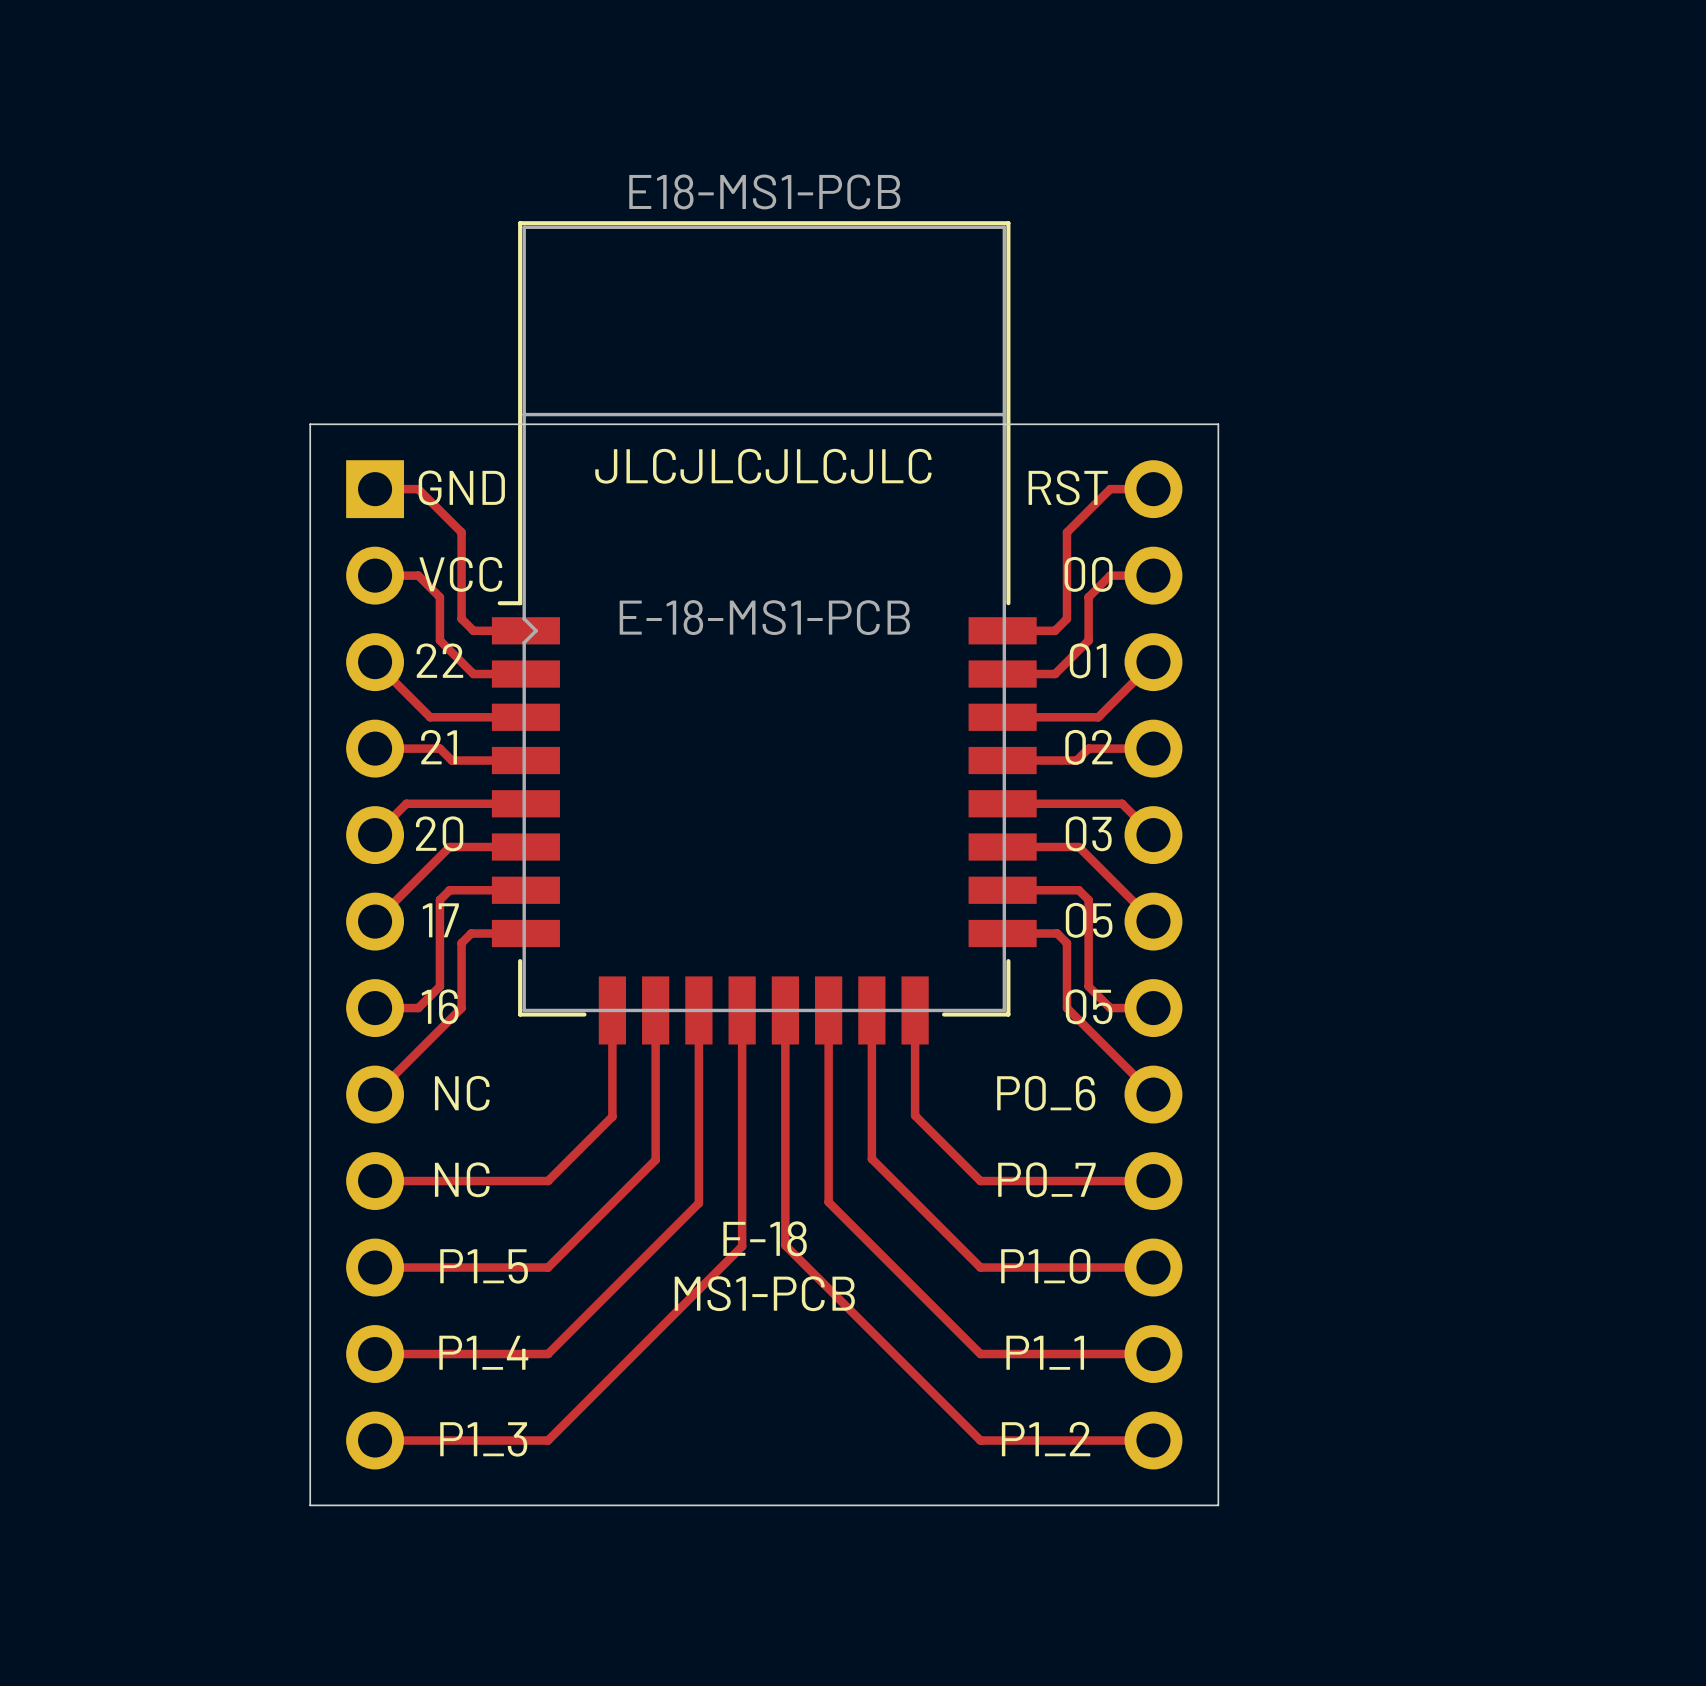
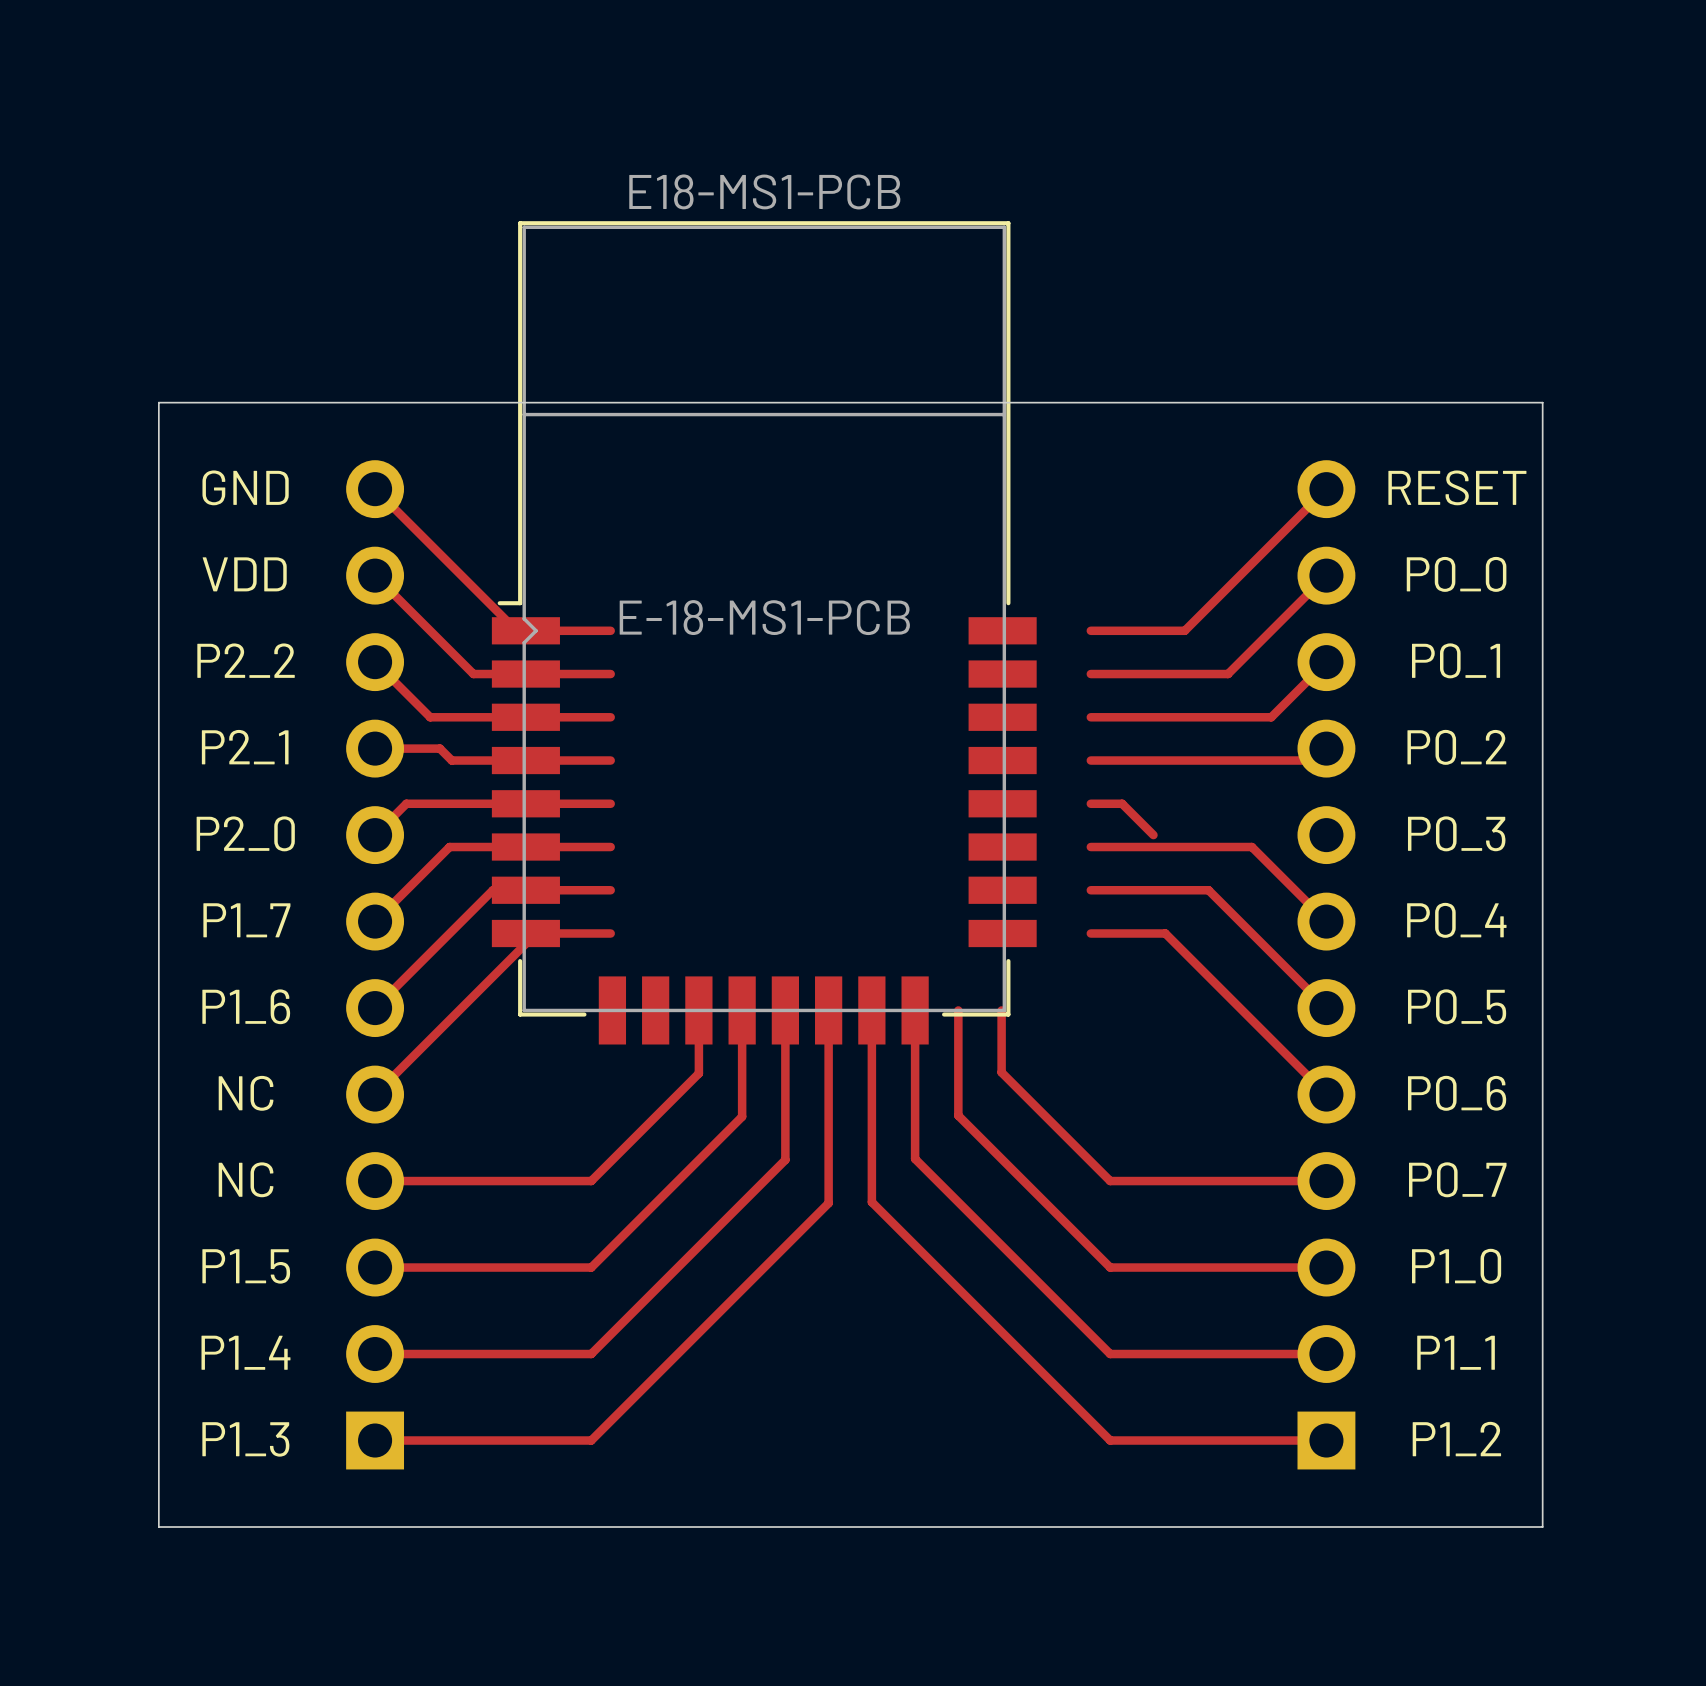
board edge: (310, 424) (310, 1505) (1218, 1505) (1218, 424) (310, 424) -> (158, 402) (158, 1527) (1542, 1527) (1542, 402) (158, 402)
text: JLCJLCJLCJLC (763, 466) -> none
text position: GND (461, 487) -> GND (245, 487)
text: RST (1068, 487) -> none
text: none -> RESET (1457, 487)
top track: (375, 489) (418, 489) (461, 532) (461, 618) (473, 630) (516, 630) -> (375, 489) (516, 630)
top track: (1153, 489) (1110, 489) (1066, 532) (1066, 618) (1055, 630) (1002, 630) -> none
top track: none -> (1326, 489) (1184, 630) (1090, 630)
text: none -> VDD (244, 574)
text: VCC (460, 574) -> none
text: 00 (1088, 574) -> none
text: none -> P0_0 (1456, 574)
top track: (375, 575) (418, 575) (439, 597) (439, 640) -> (375, 575) (439, 640)
top track: (1153, 575) (1110, 575) (1088, 597) (1088, 640) (1055, 674) (1002, 674) -> none
top track: none -> (1326, 575) (1228, 674) (1090, 674)
top track: none -> (525, 630) (610, 630)
text: none -> P2_2 (246, 660)
text: 22 (439, 660) -> none
text: 01 (1088, 660) -> none
text: none -> P0_1 (1456, 660)
top track: (1153, 662) (1098, 717) -> (1326, 662) (1271, 717) (1098, 717)
top track: none -> (525, 674) (610, 674)
top track: none -> (525, 717) (610, 717)
top track: (1002, 717) (1090, 717) -> none
text: none -> P2_1 (245, 747)
text: 21 (439, 747) -> none
text: 02 (1088, 747) -> none
text: none -> P0_2 (1456, 747)
top track: (1153, 748) (1088, 748) (1076, 760) (1002, 760) -> none
top track: none -> (1326, 748) (1314, 760) (1090, 760)
top track: none -> (525, 760) (610, 760)
top track: none -> (525, 803) (610, 803)
top track: (1002, 803) (1090, 803) -> none
text: none -> P2_0 (245, 833)
text: 20 (439, 833) -> none
text: 03 (1088, 833) -> none
text: none -> P0_3 (1456, 833)
top track: none -> (525, 847) (610, 847)
top track: (1002, 847) (1078, 847) (1153, 921) -> none
top track: none -> (1090, 847) (1251, 847) (1326, 921)
top track: (492, 890) (449, 890) (439, 899) (439, 986) (418, 1008) (375, 1008) -> (492, 890) (375, 1008)
top track: none -> (525, 890) (610, 890)
top track: (1002, 890) (1078, 890) (1088, 899) (1088, 986) (1110, 1008) (1153, 1008) -> none
top track: none -> (1090, 890) (1208, 890) (1326, 1008)
text: none -> P1_7 (246, 920)
text: 17 (440, 920) -> none
text: 05 (1089, 920) -> none
text: none -> P0_4 (1456, 920)
top track: (525, 933) (471, 933) (461, 943) (461, 1008) -> (610, 933) (536, 933) (461, 1008)
top track: (1002, 933) (1057, 933) (1066, 943) (1066, 1008) (1153, 1094) -> none
top track: none -> (1090, 933) (1165, 933) (1326, 1094)
part rotation: 0° (375, 964) -> 180° (375, 964)
part: (1153, 964) -> none
part: none -> (1326, 964)
text: none -> P1_6 (246, 1006)
text: 16 (440, 1006) -> none
text: 05 (1089, 1006) -> none
text: none -> P0_5 (1457, 1006)
top track: (612, 1010) (612, 1116) (548, 1181) -> (698, 1073) (591, 1181) (548, 1181)
top track: (655, 1010) (655, 1159) (548, 1267) -> (742, 1116) (591, 1267) (548, 1267)
top track: (698, 1073) (698, 1203) (548, 1354) -> (785, 1159) (591, 1354) (548, 1354)
text: none -> NC (246, 1093)
text: NC (462, 1093) -> none
text position: P0_6 (1046, 1093) -> P0_6 (1457, 1093)
top track: (915, 1115) (980, 1181) (1110, 1181) -> (1001, 1010) (1001, 1072) (1110, 1181)
top track: (742, 1116) (742, 1246) (548, 1440) -> (828, 1202) (591, 1440) (548, 1440)
top track: (871, 1158) (980, 1267) (1110, 1267) -> (958, 1010) (958, 1115) (1110, 1267)
top track: (785, 1159) (785, 1245) (980, 1440) (1110, 1440) -> (871, 1158) (871, 1202) (1110, 1440)
text: none -> NC (246, 1179)
text: NC (462, 1179) -> none
text position: P0_7 (1046, 1179) -> P0_7 (1457, 1179)
top track: none -> (1153, 1181) (1326, 1181)
top track: (828, 1202) (980, 1354) (1110, 1354) -> (915, 1115) (915, 1158) (1110, 1354)
text: E-18 (765, 1238) -> none
text position: P1_5 (484, 1266) -> P1_5 (246, 1266)
text position: P1_0 (1045, 1266) -> P1_0 (1456, 1266)
top track: none -> (1153, 1267) (1326, 1267)
text: MS1-PCB (764, 1293) -> none
text position: P1_4 (483, 1352) -> P1_4 (245, 1352)
text position: P1_1 (1045, 1352) -> P1_1 (1456, 1352)
top track: none -> (1153, 1354) (1326, 1354)
text position: P1_3 (483, 1439) -> P1_3 (245, 1439)
text position: P1_2 (1046, 1439) -> P1_2 (1456, 1439)
top track: none -> (1153, 1440) (1326, 1440)

